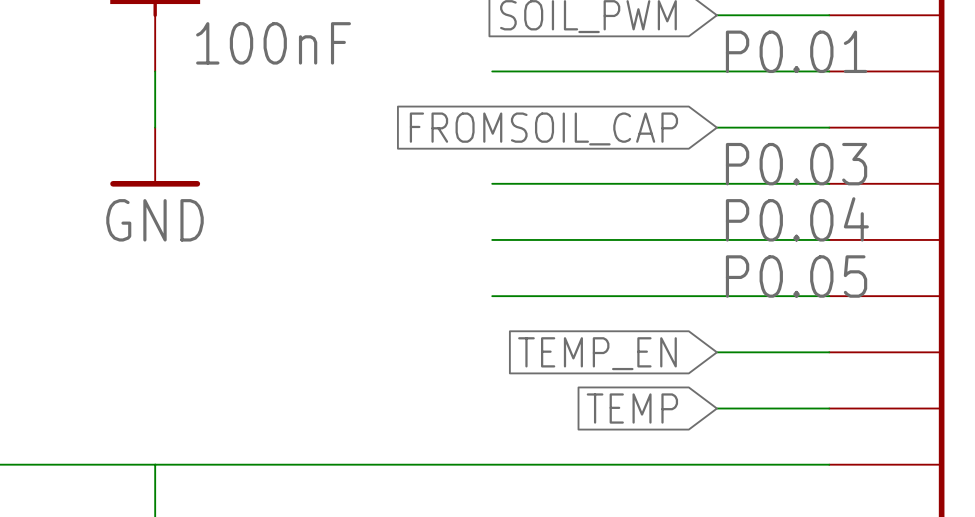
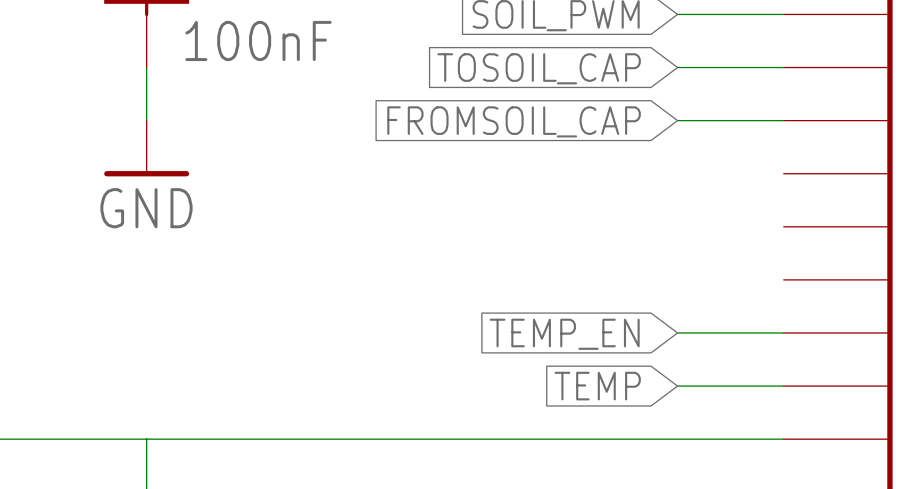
label: P0.01 (796, 51) -> none
wire: (492, 71) (716, 71) -> none
global label: none -> TOSOIL_CAP (539, 68)
label: P0.03 (796, 164) -> none
wire: (492, 183) (829, 183) -> none
label: P0.04 (797, 219) -> none
wire: (492, 239) (829, 239) -> none
label: P0.05 (796, 276) -> none
wire: (492, 296) (829, 296) -> none

